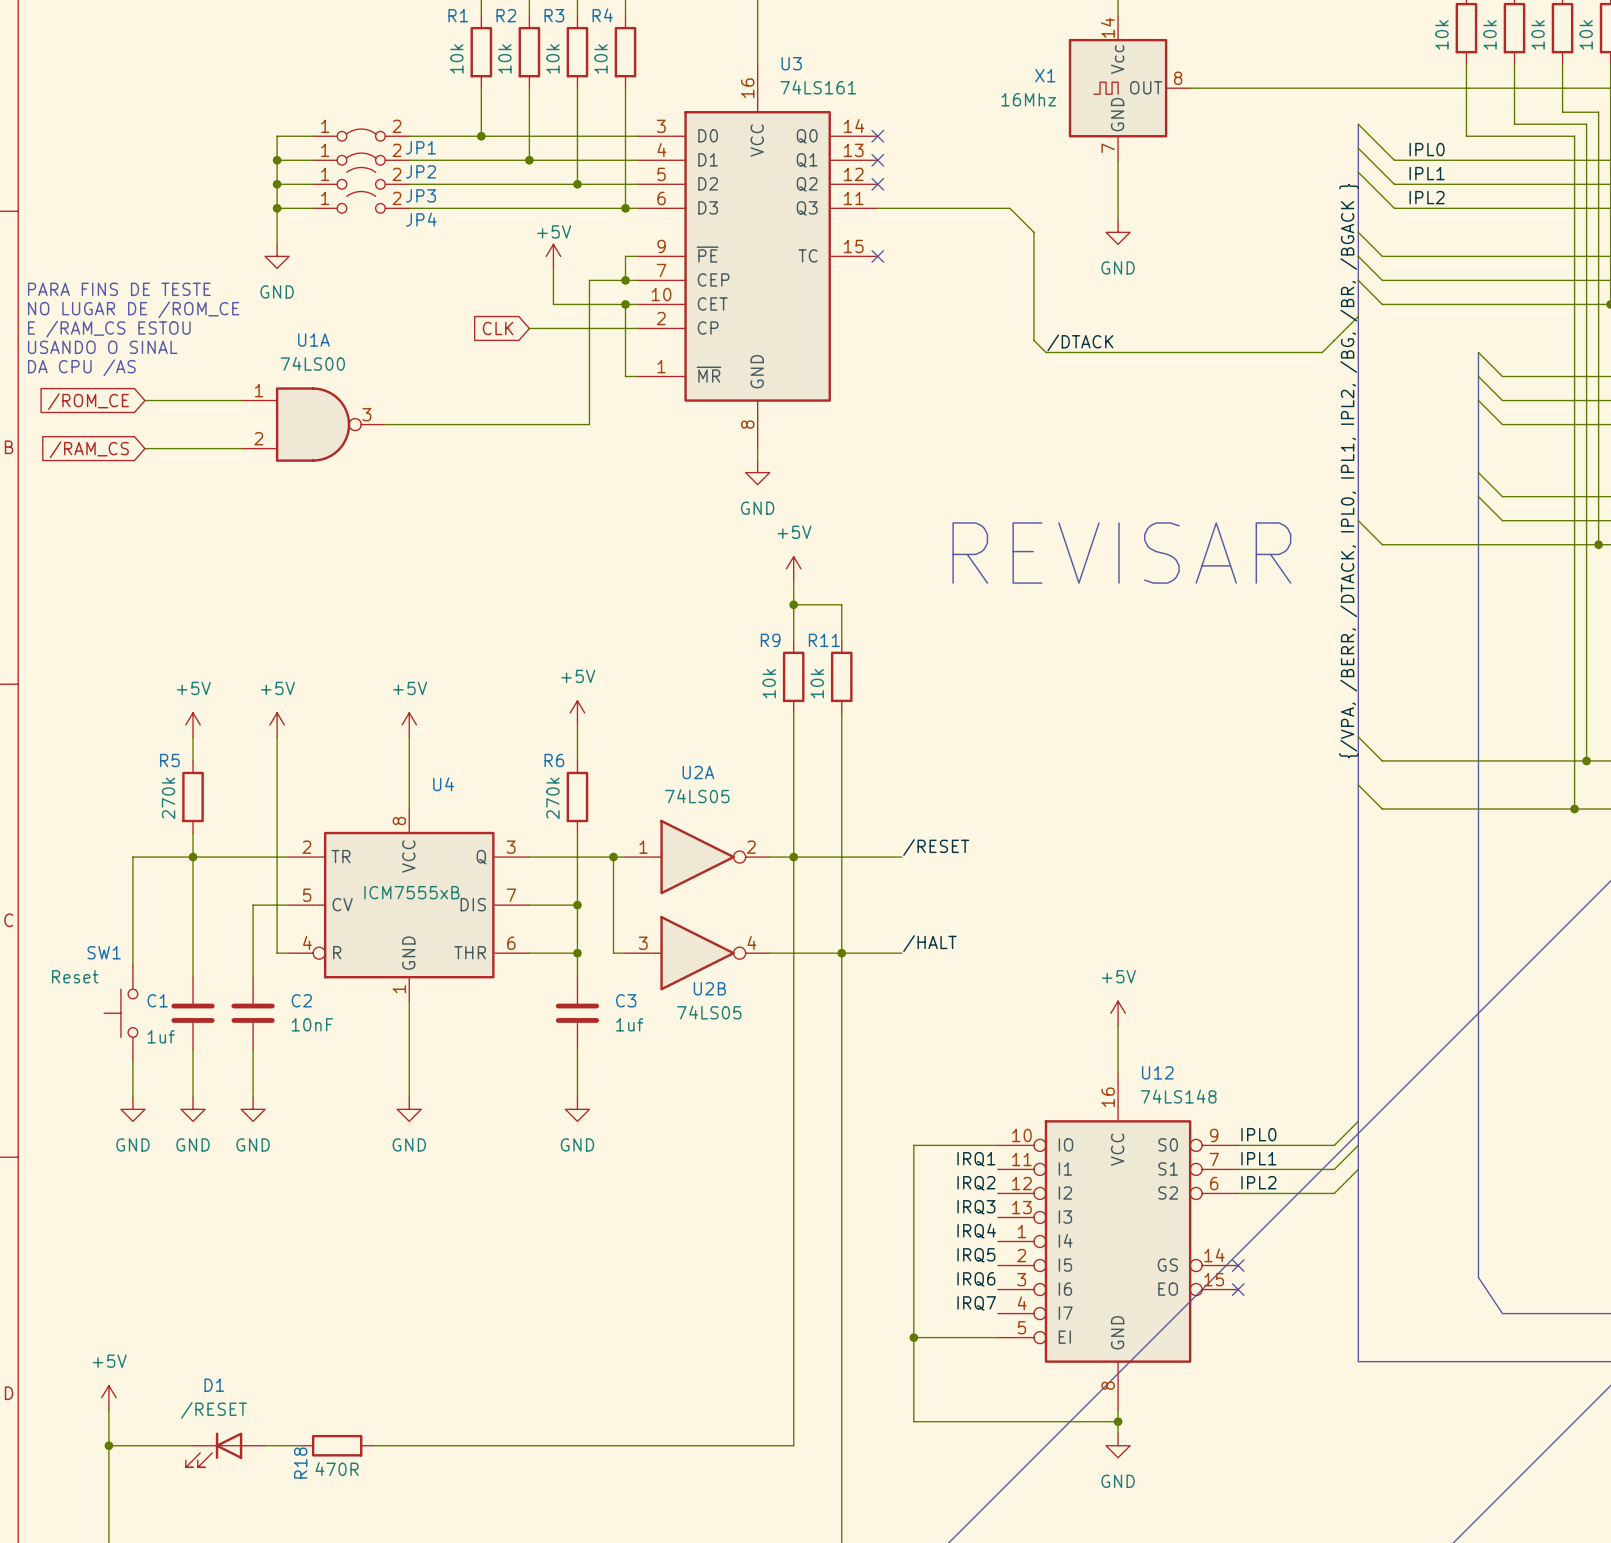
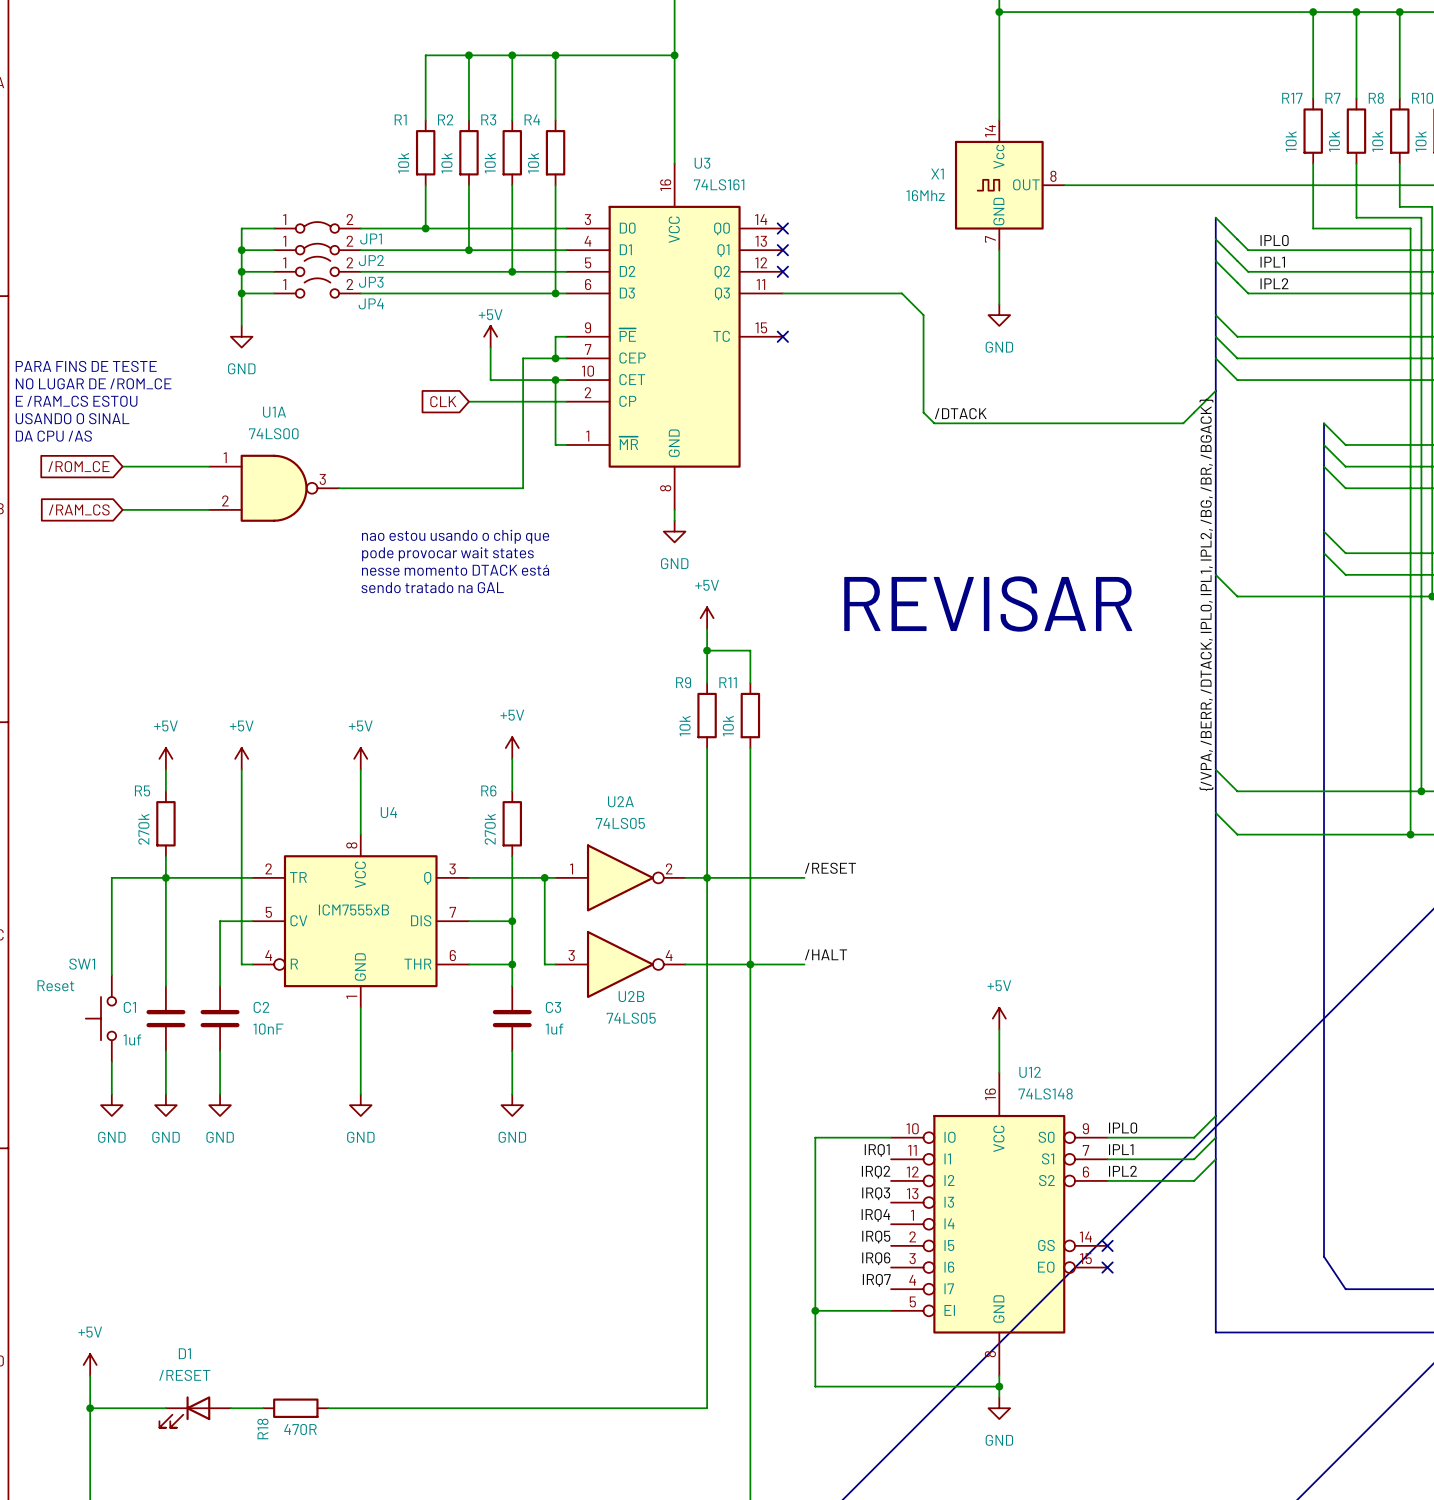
text: none -> nao estou usando o chip que (455, 536)
text: none -> pode provocar wait states (447, 554)
text: none -> nesse momento DTACK está (455, 570)
text: none -> sendo tratado na GAL (432, 587)

